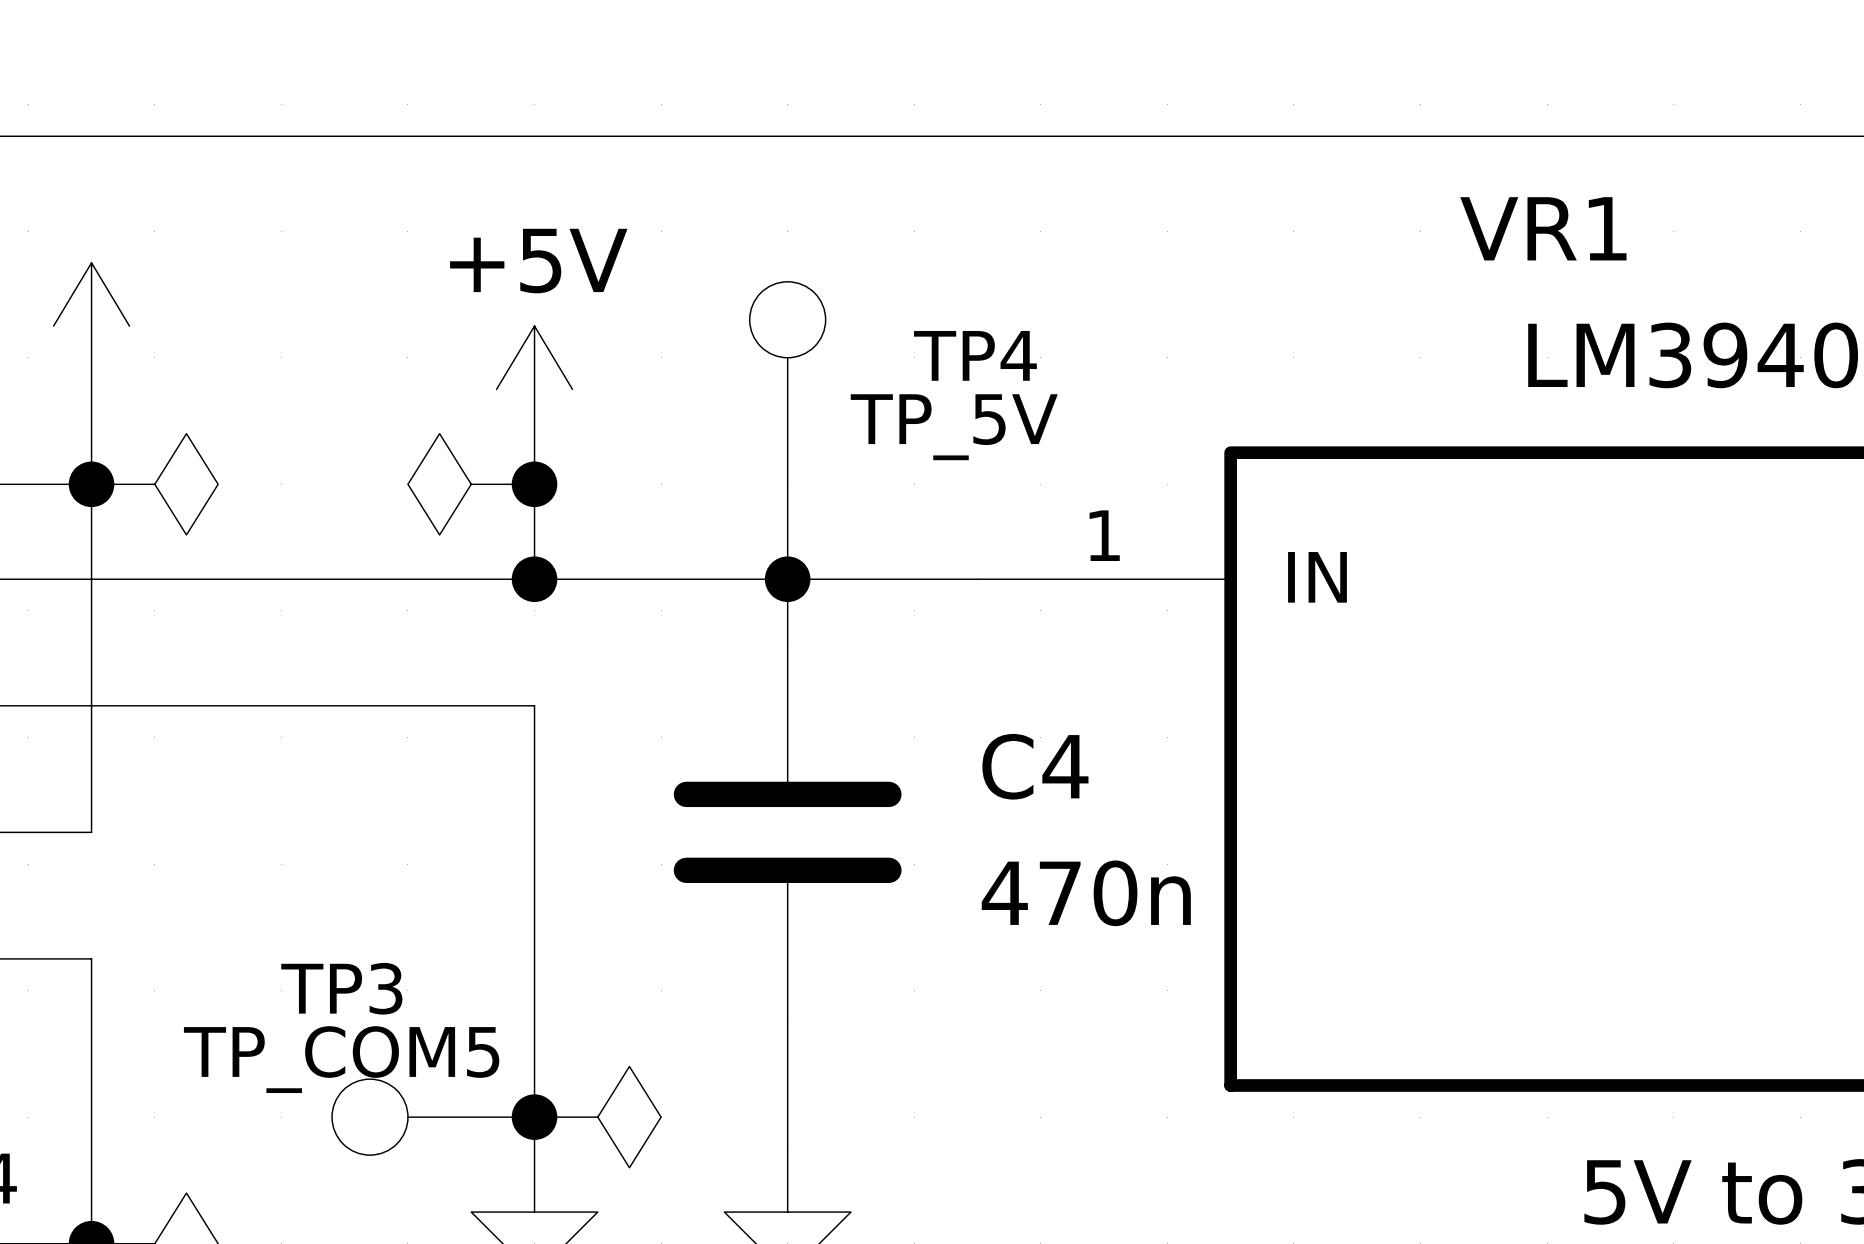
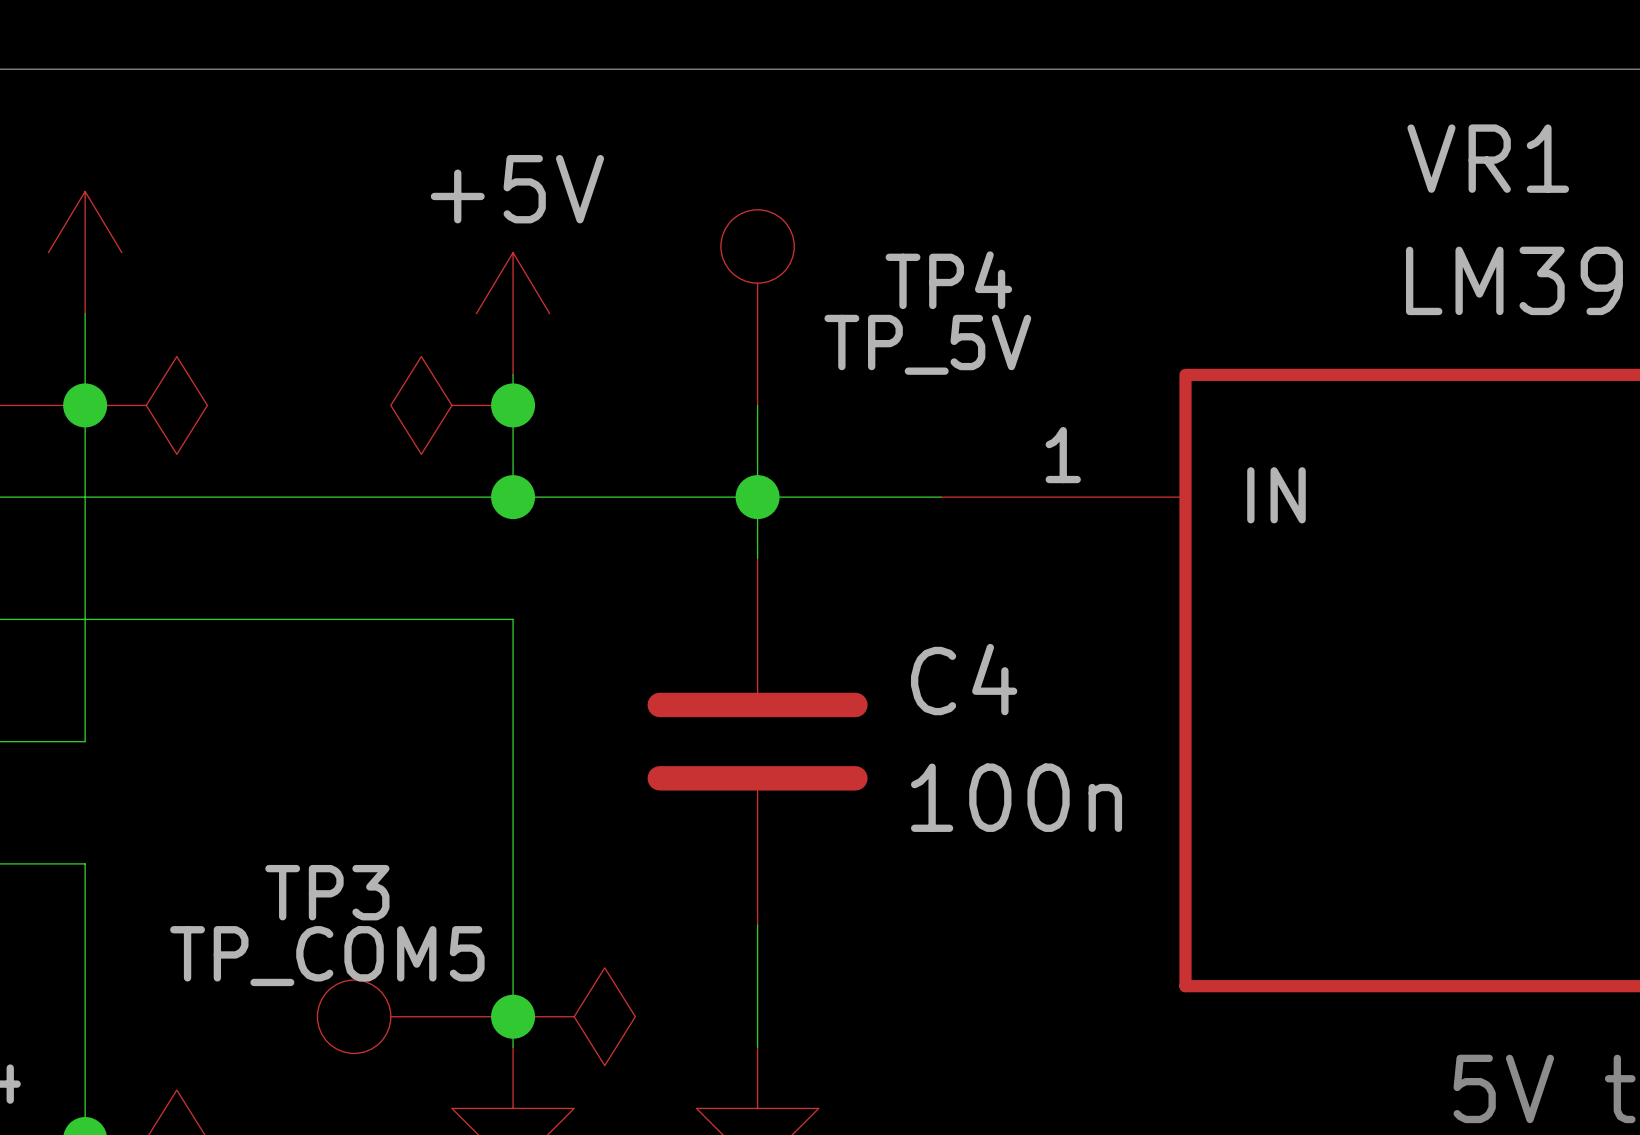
C4 name position: C4 (1035, 766) -> C4 (964, 679)
C4 value: 470n (1086, 893) -> 100n (1016, 797)

